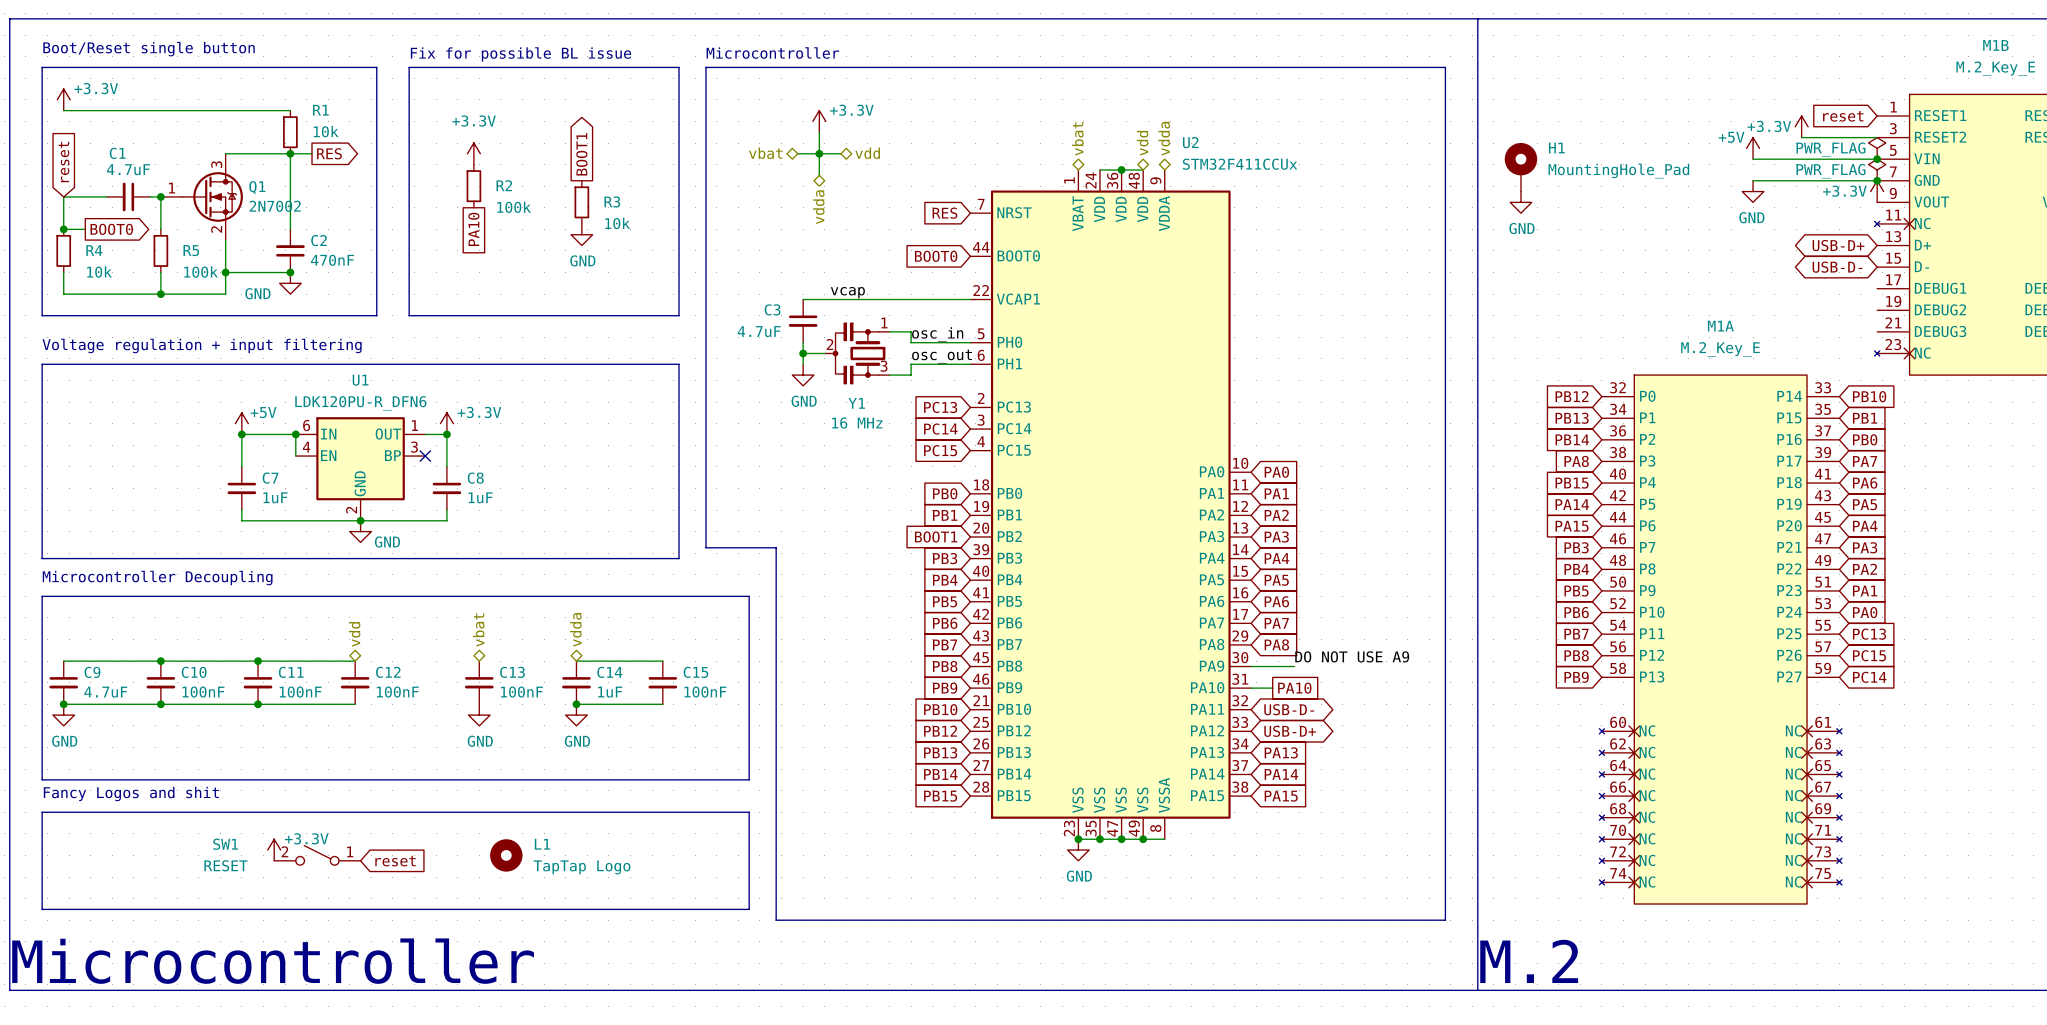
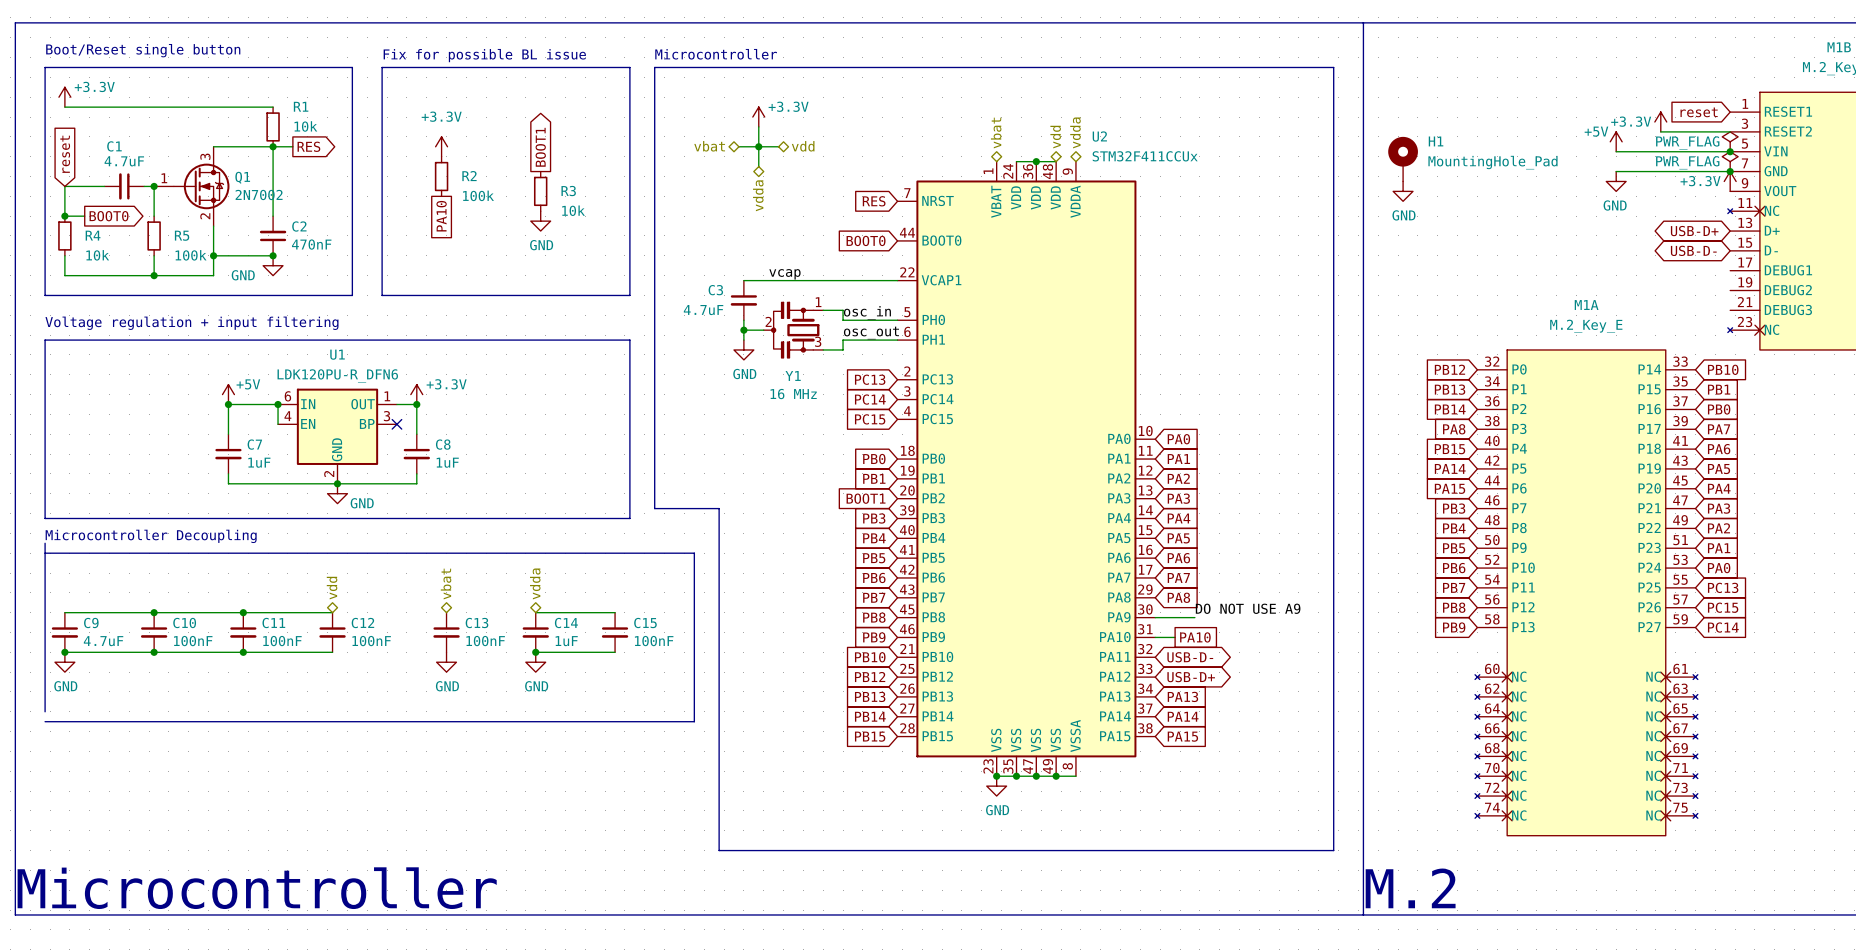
line: (42, 769) (42, 779) -> (45, 543) (45, 553)
text: Fancy Logos and shit (131, 793) -> none
line: (42, 812) (42, 909) (749, 909) (749, 812) (42, 812) -> none
power symbol: +3.3V (274, 850) -> none
SW1: RESET (317, 855) -> none
L1: TapTap Logo (506, 855) -> none
global label: reset (395, 861) -> none

